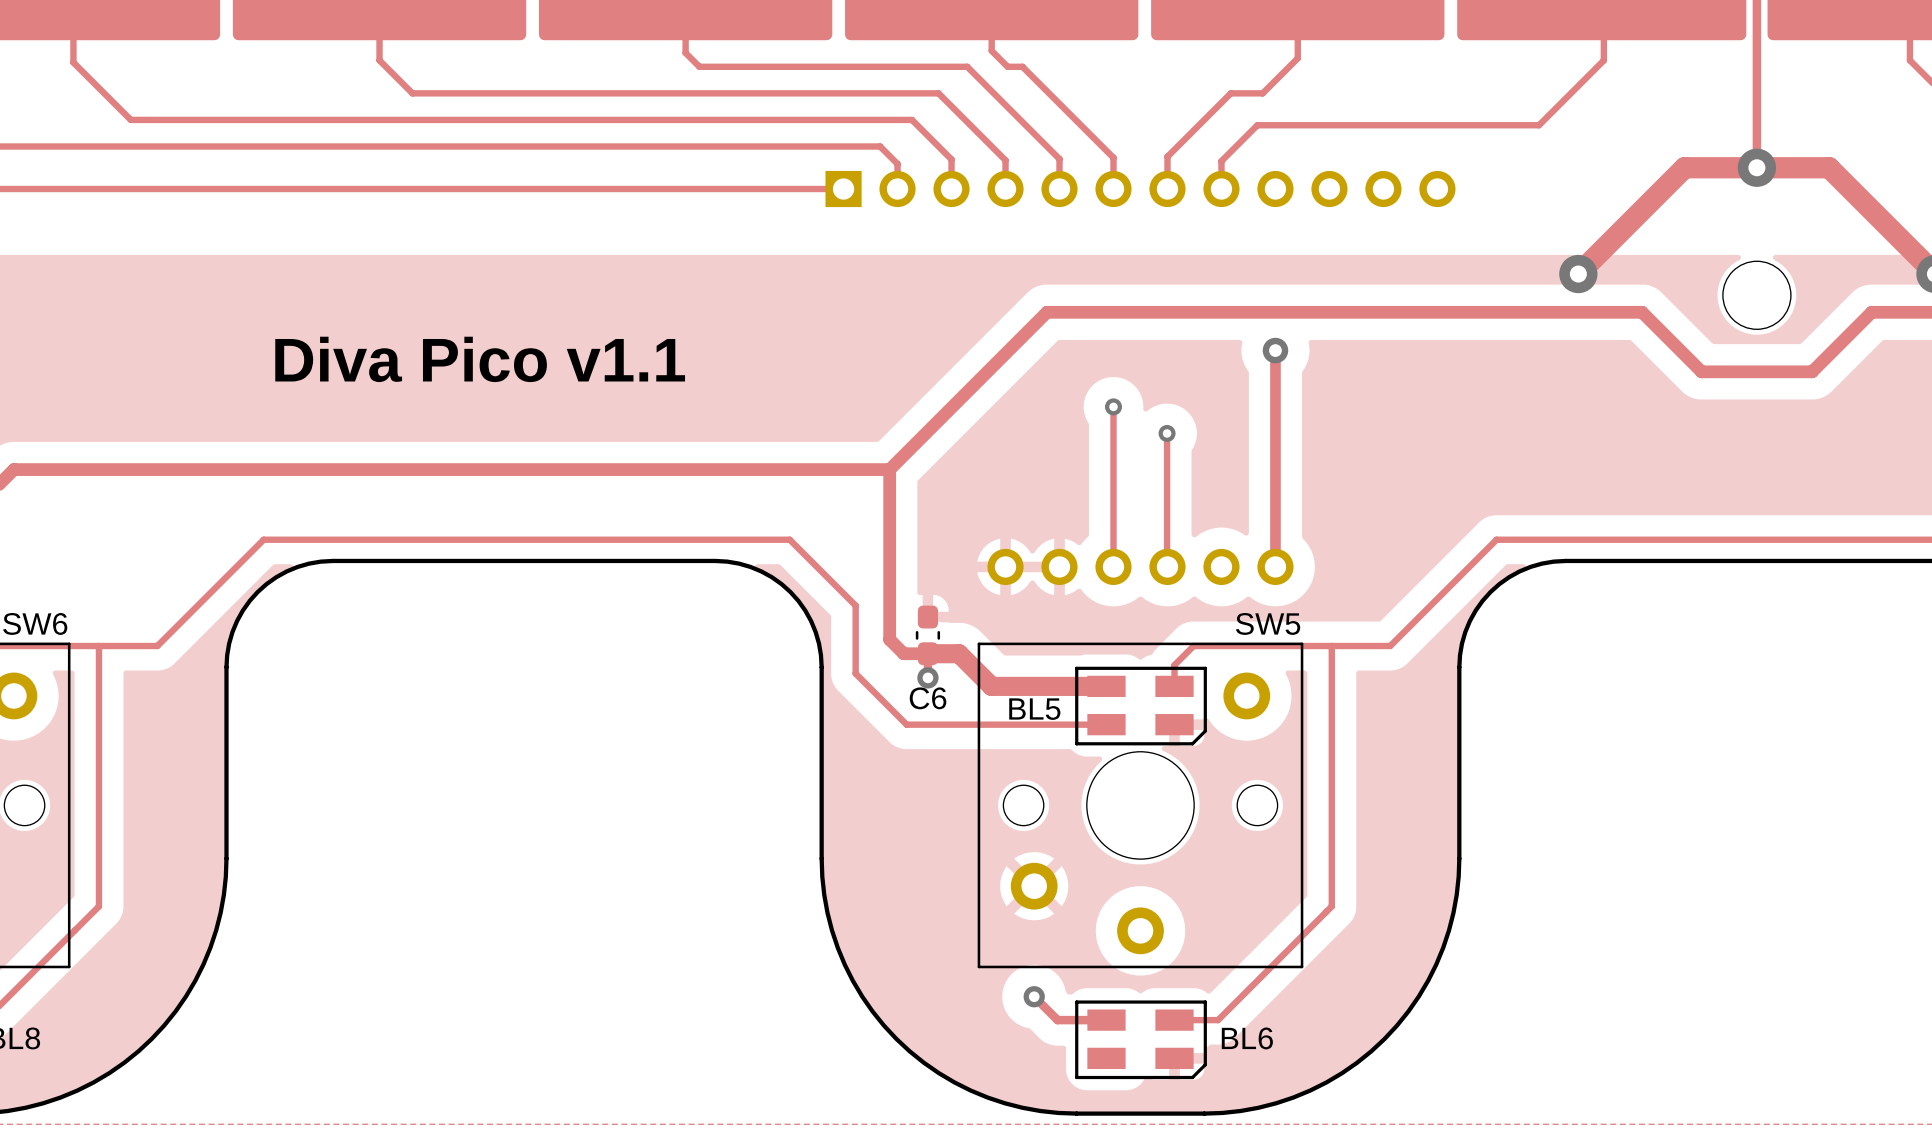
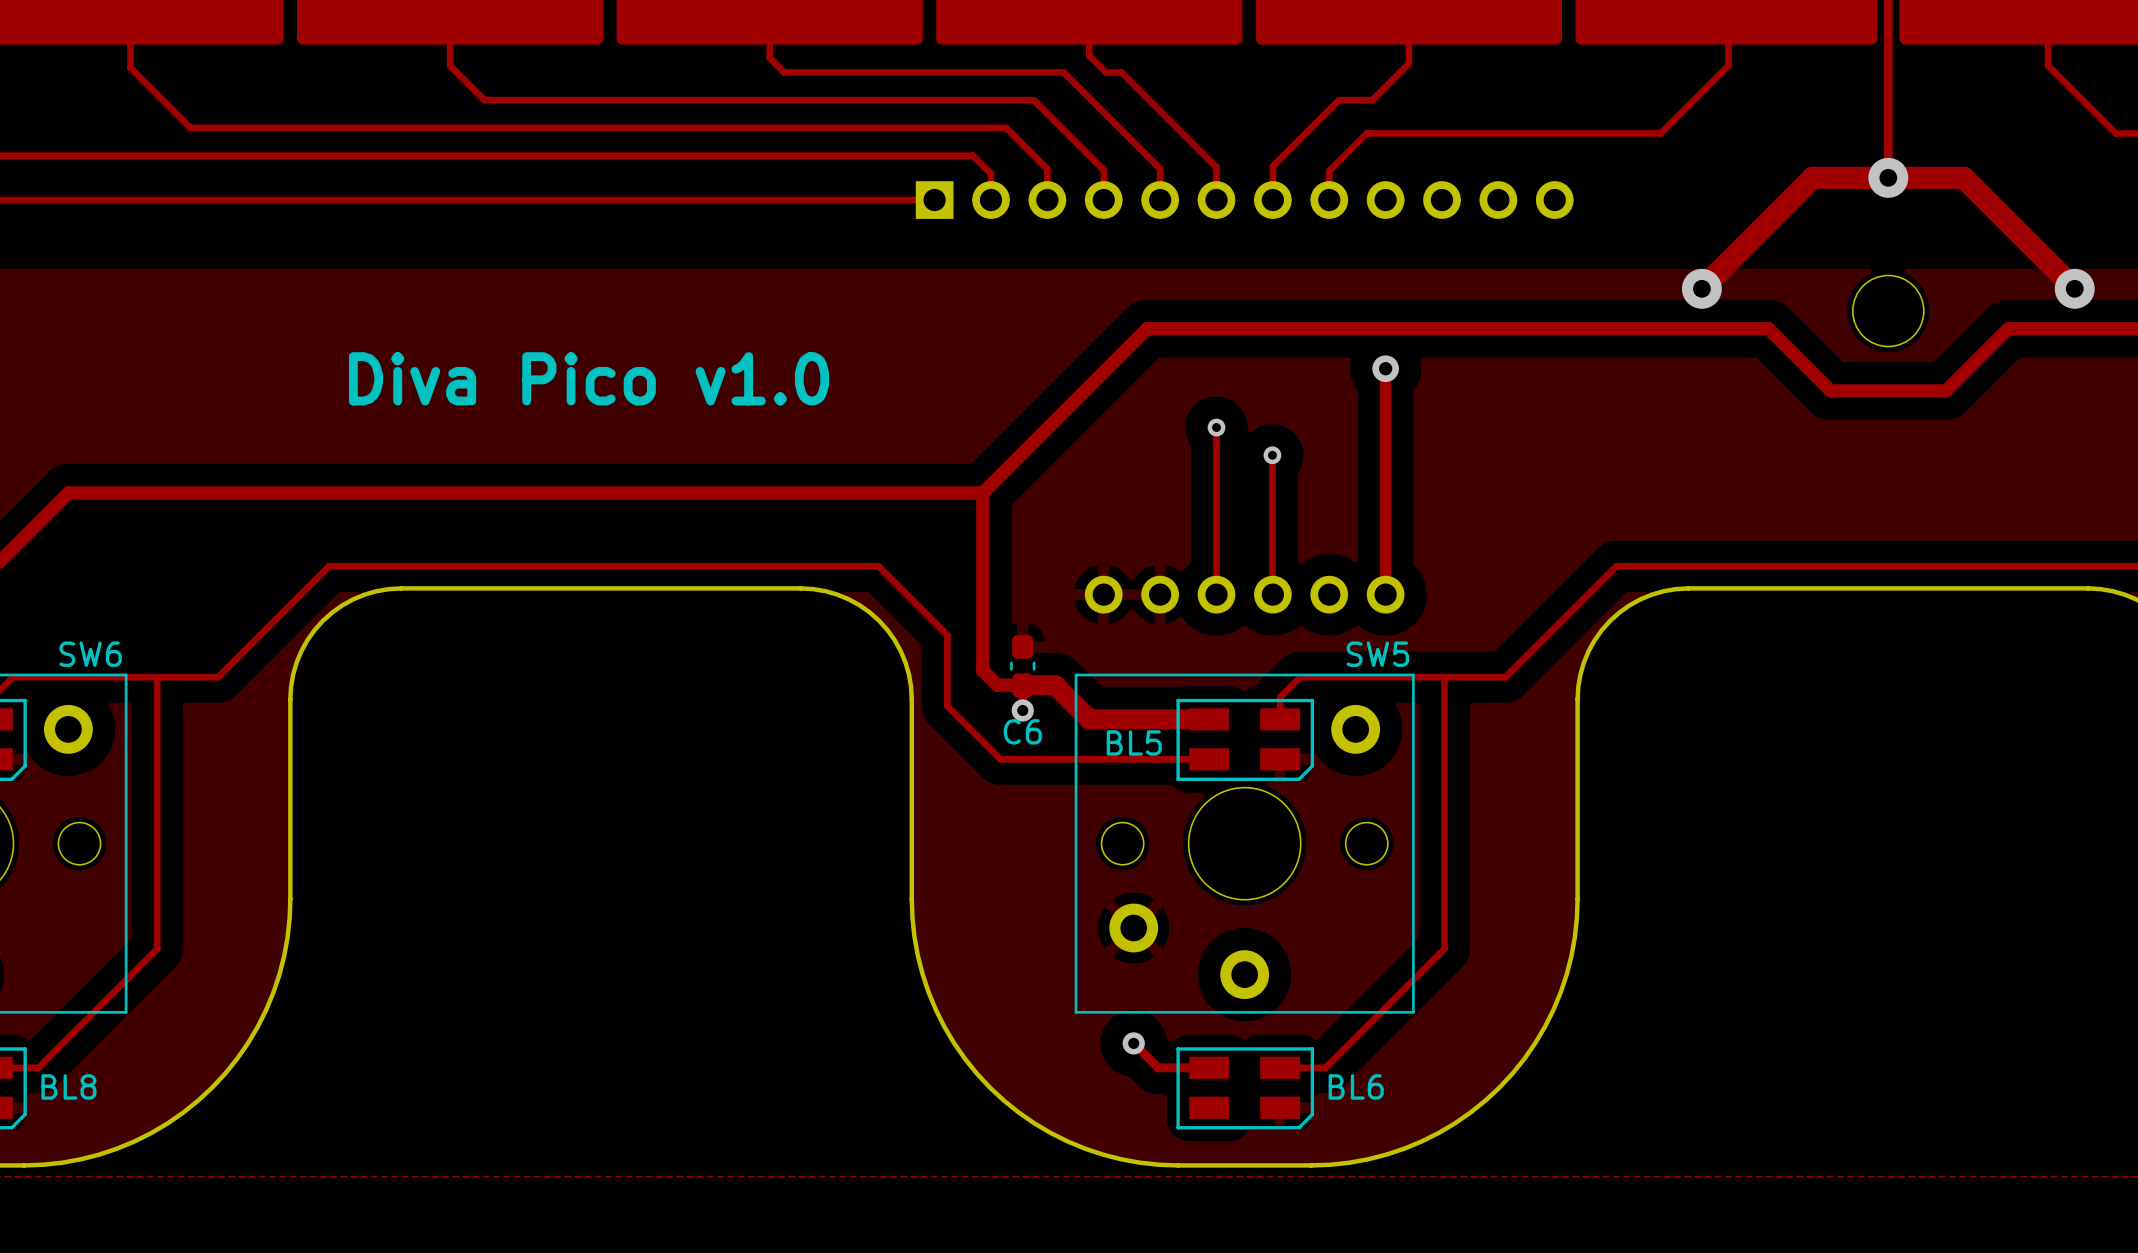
text: Diva Pico v1.1 (480, 359) -> Diva Pico v1.0 (589, 378)

